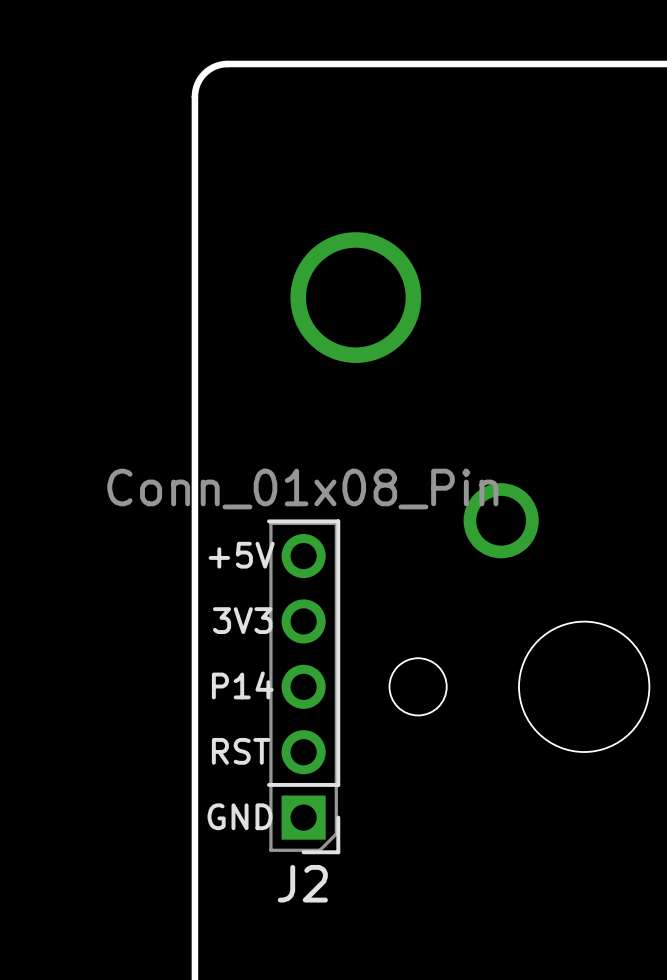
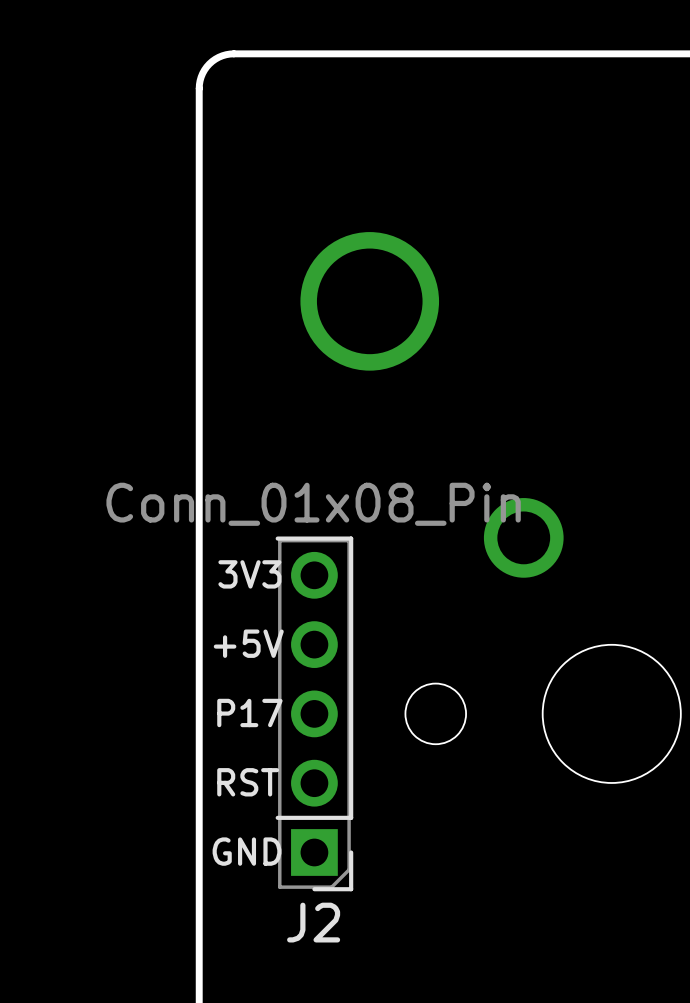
text: +5V (241, 555) -> 3V3 (249, 574)
text: 3V3 (242, 620) -> +5V (248, 643)
text: P14 (242, 685) -> P17 (249, 712)

